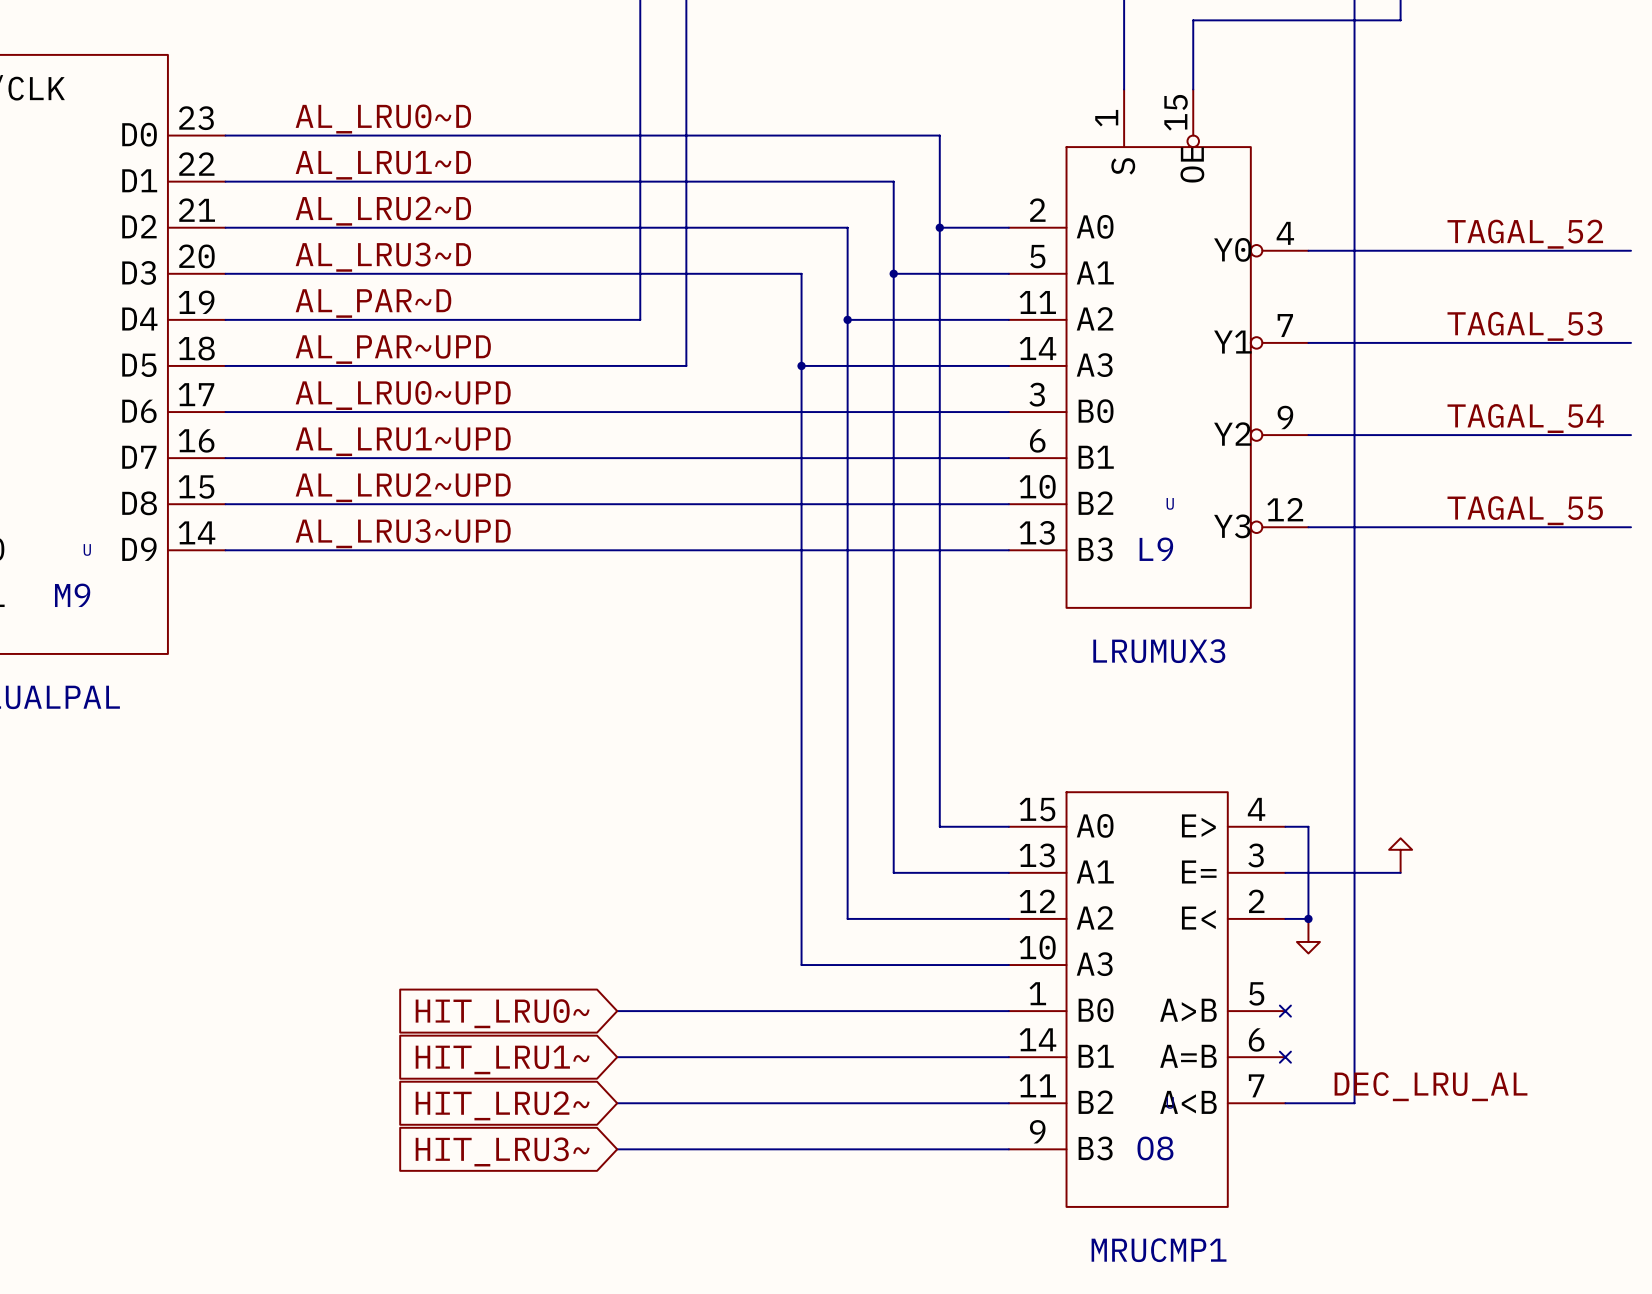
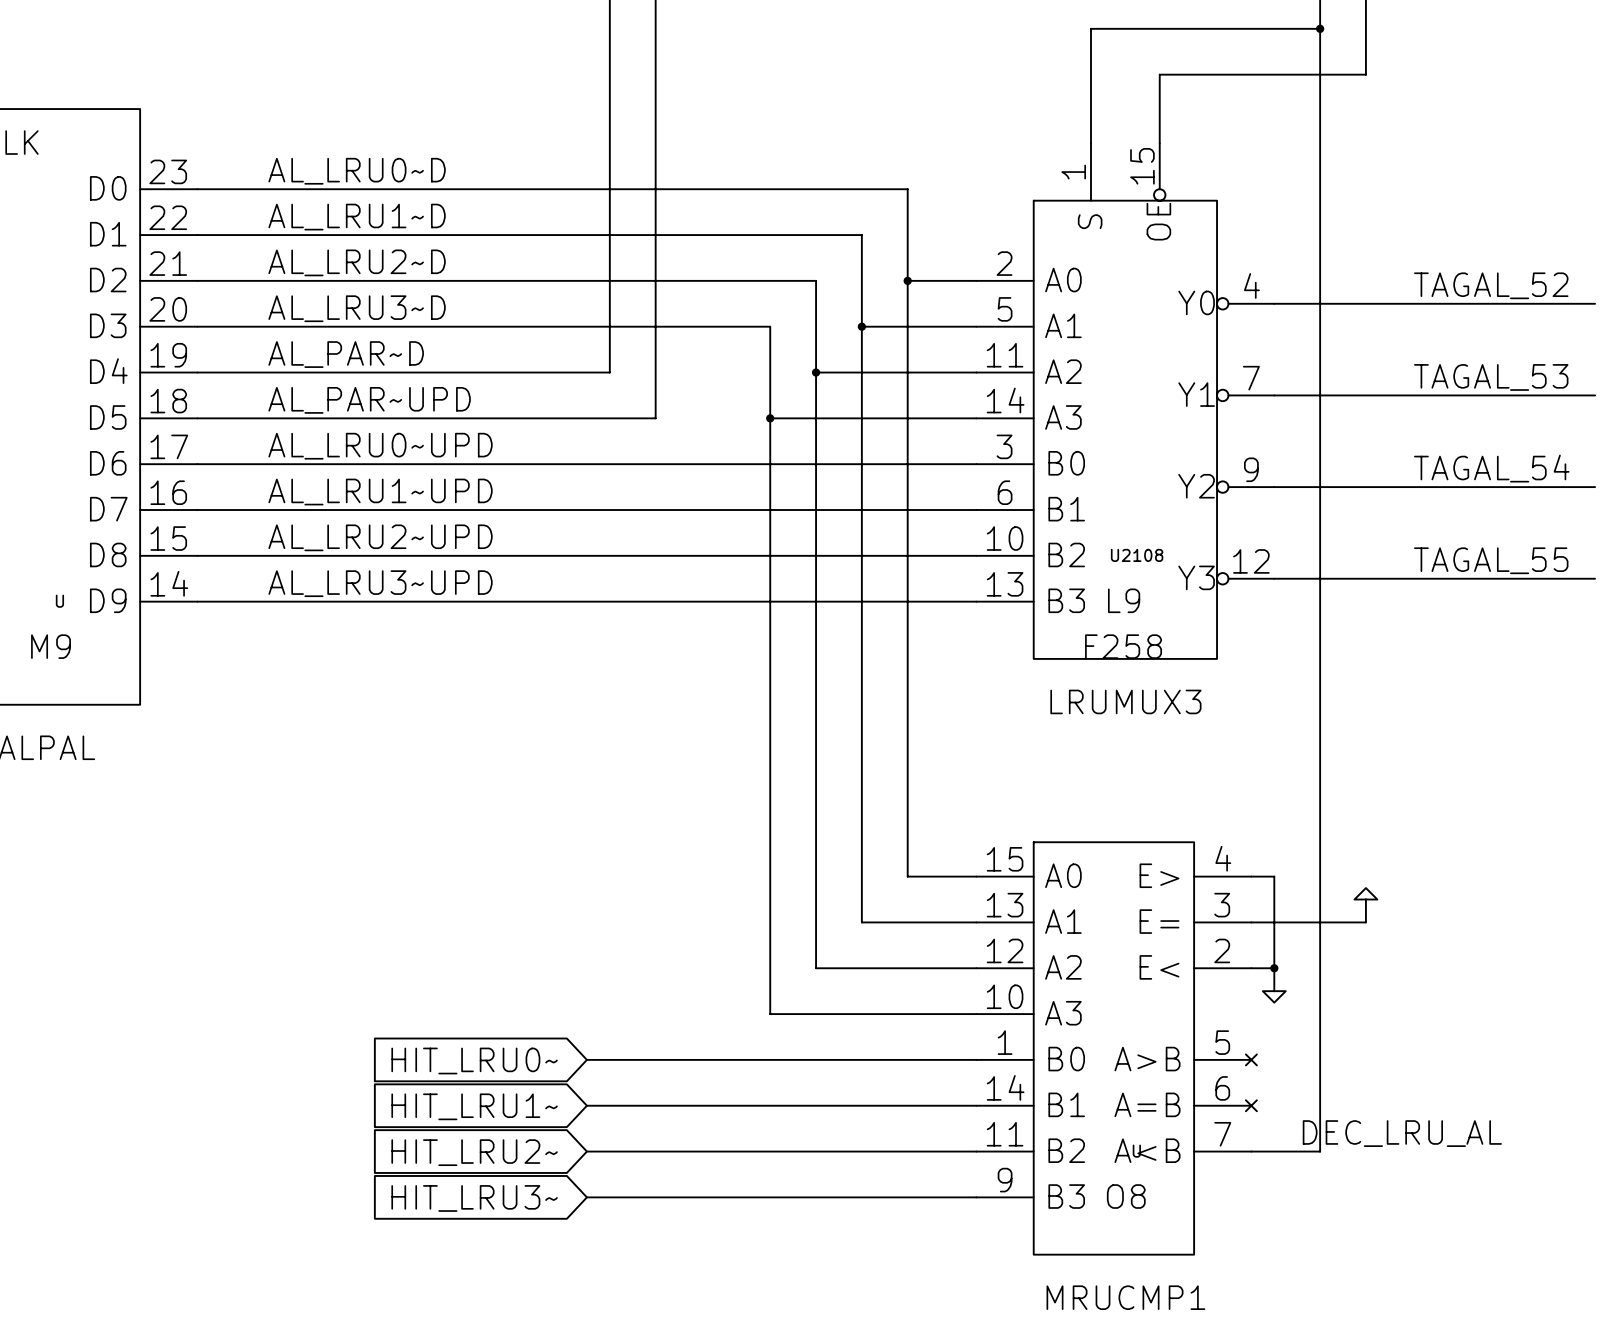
U name: U (1170, 503) -> U2108 (1137, 555)
U value: none -> F258 (1123, 646)

